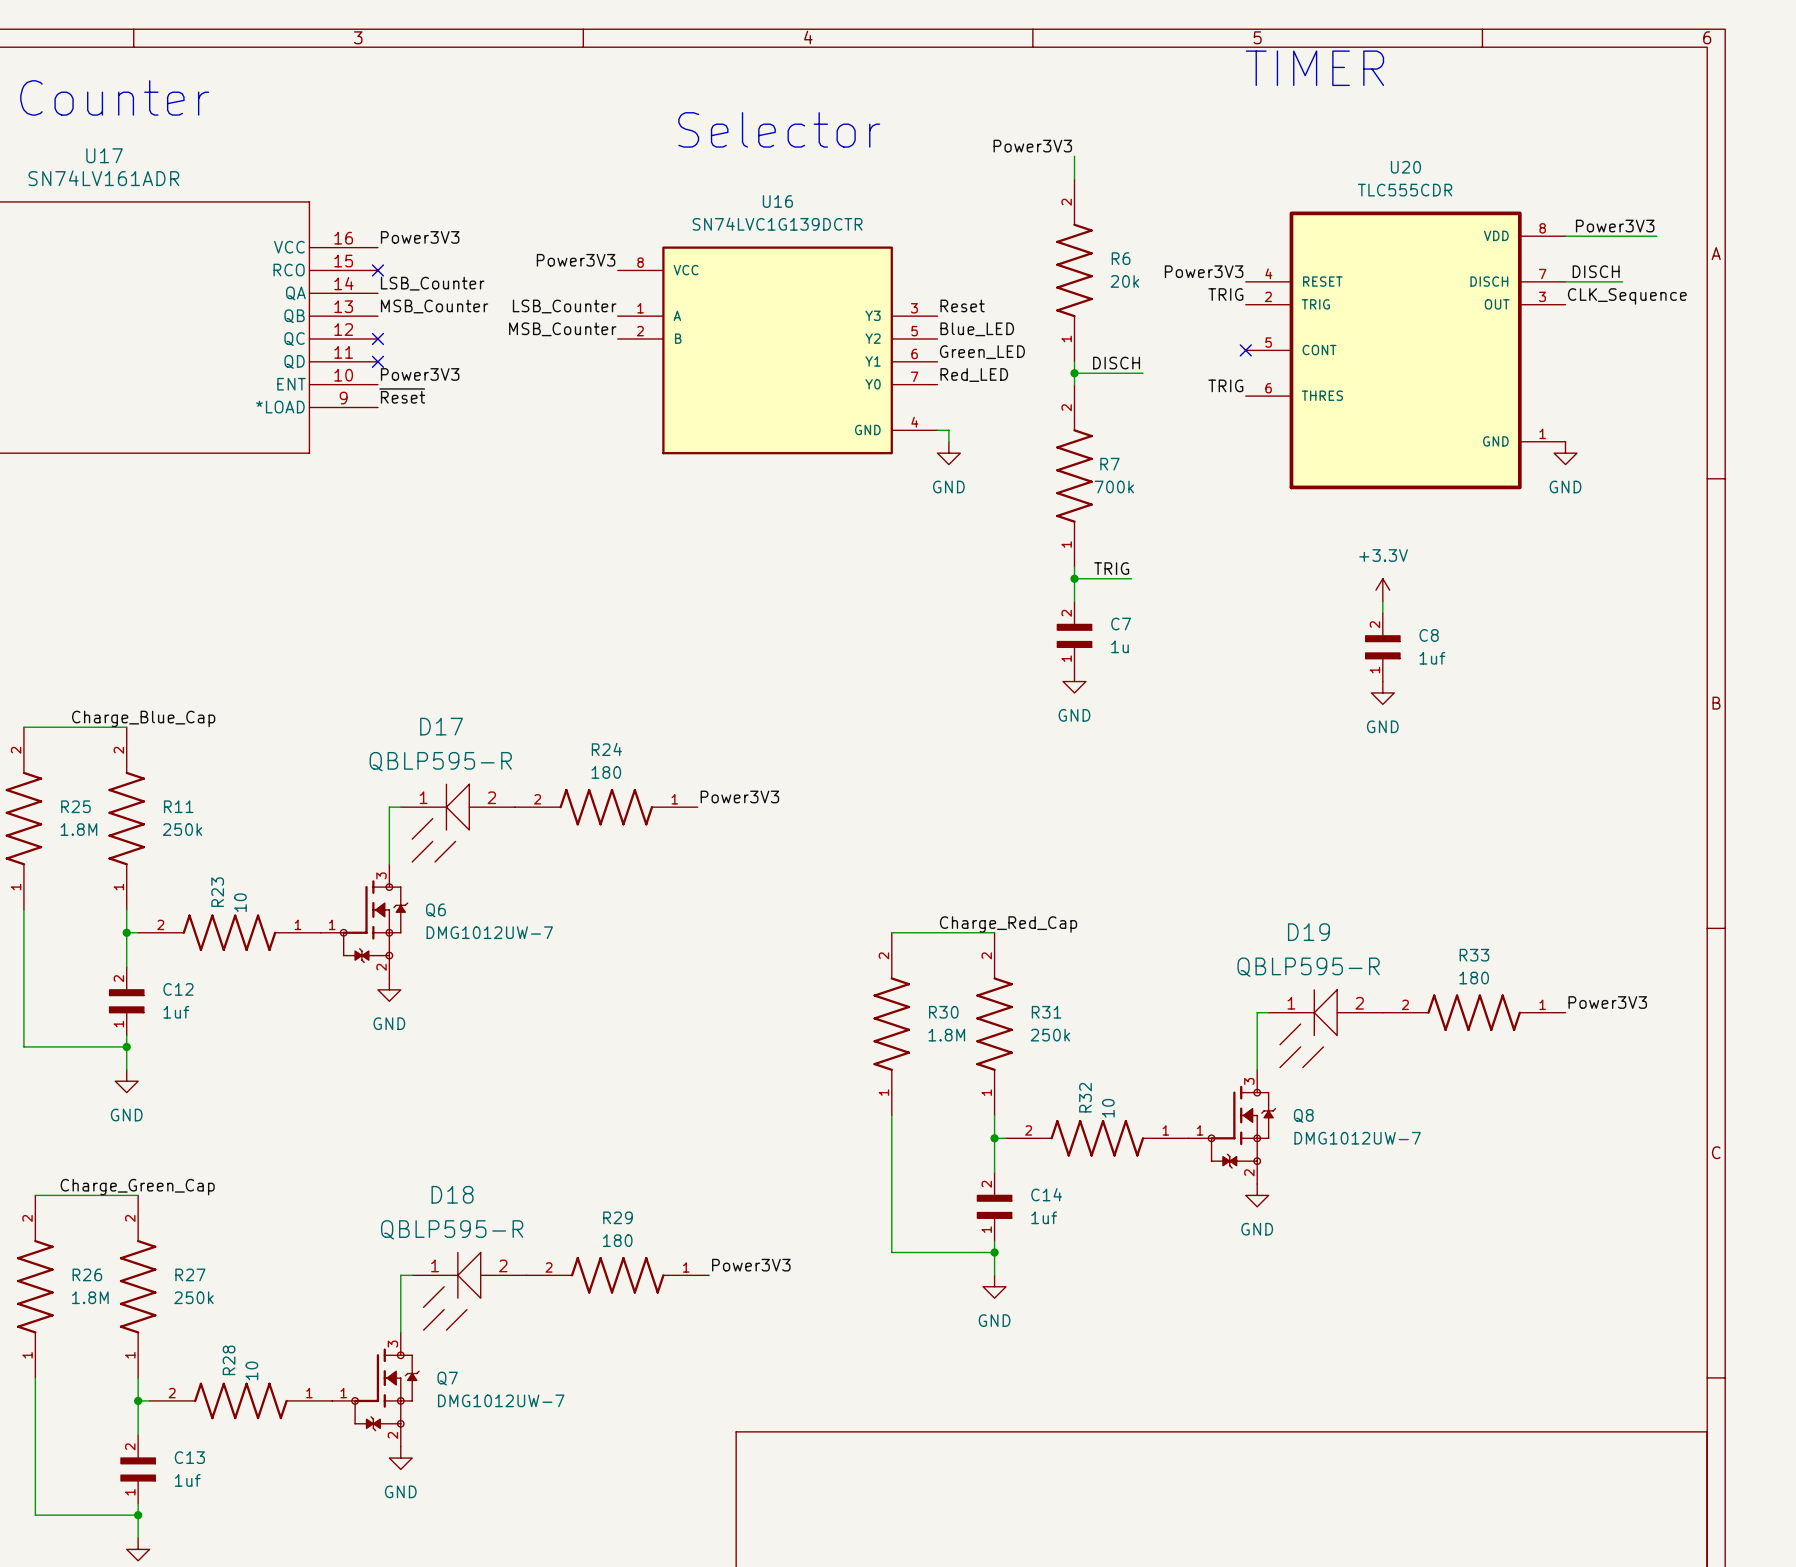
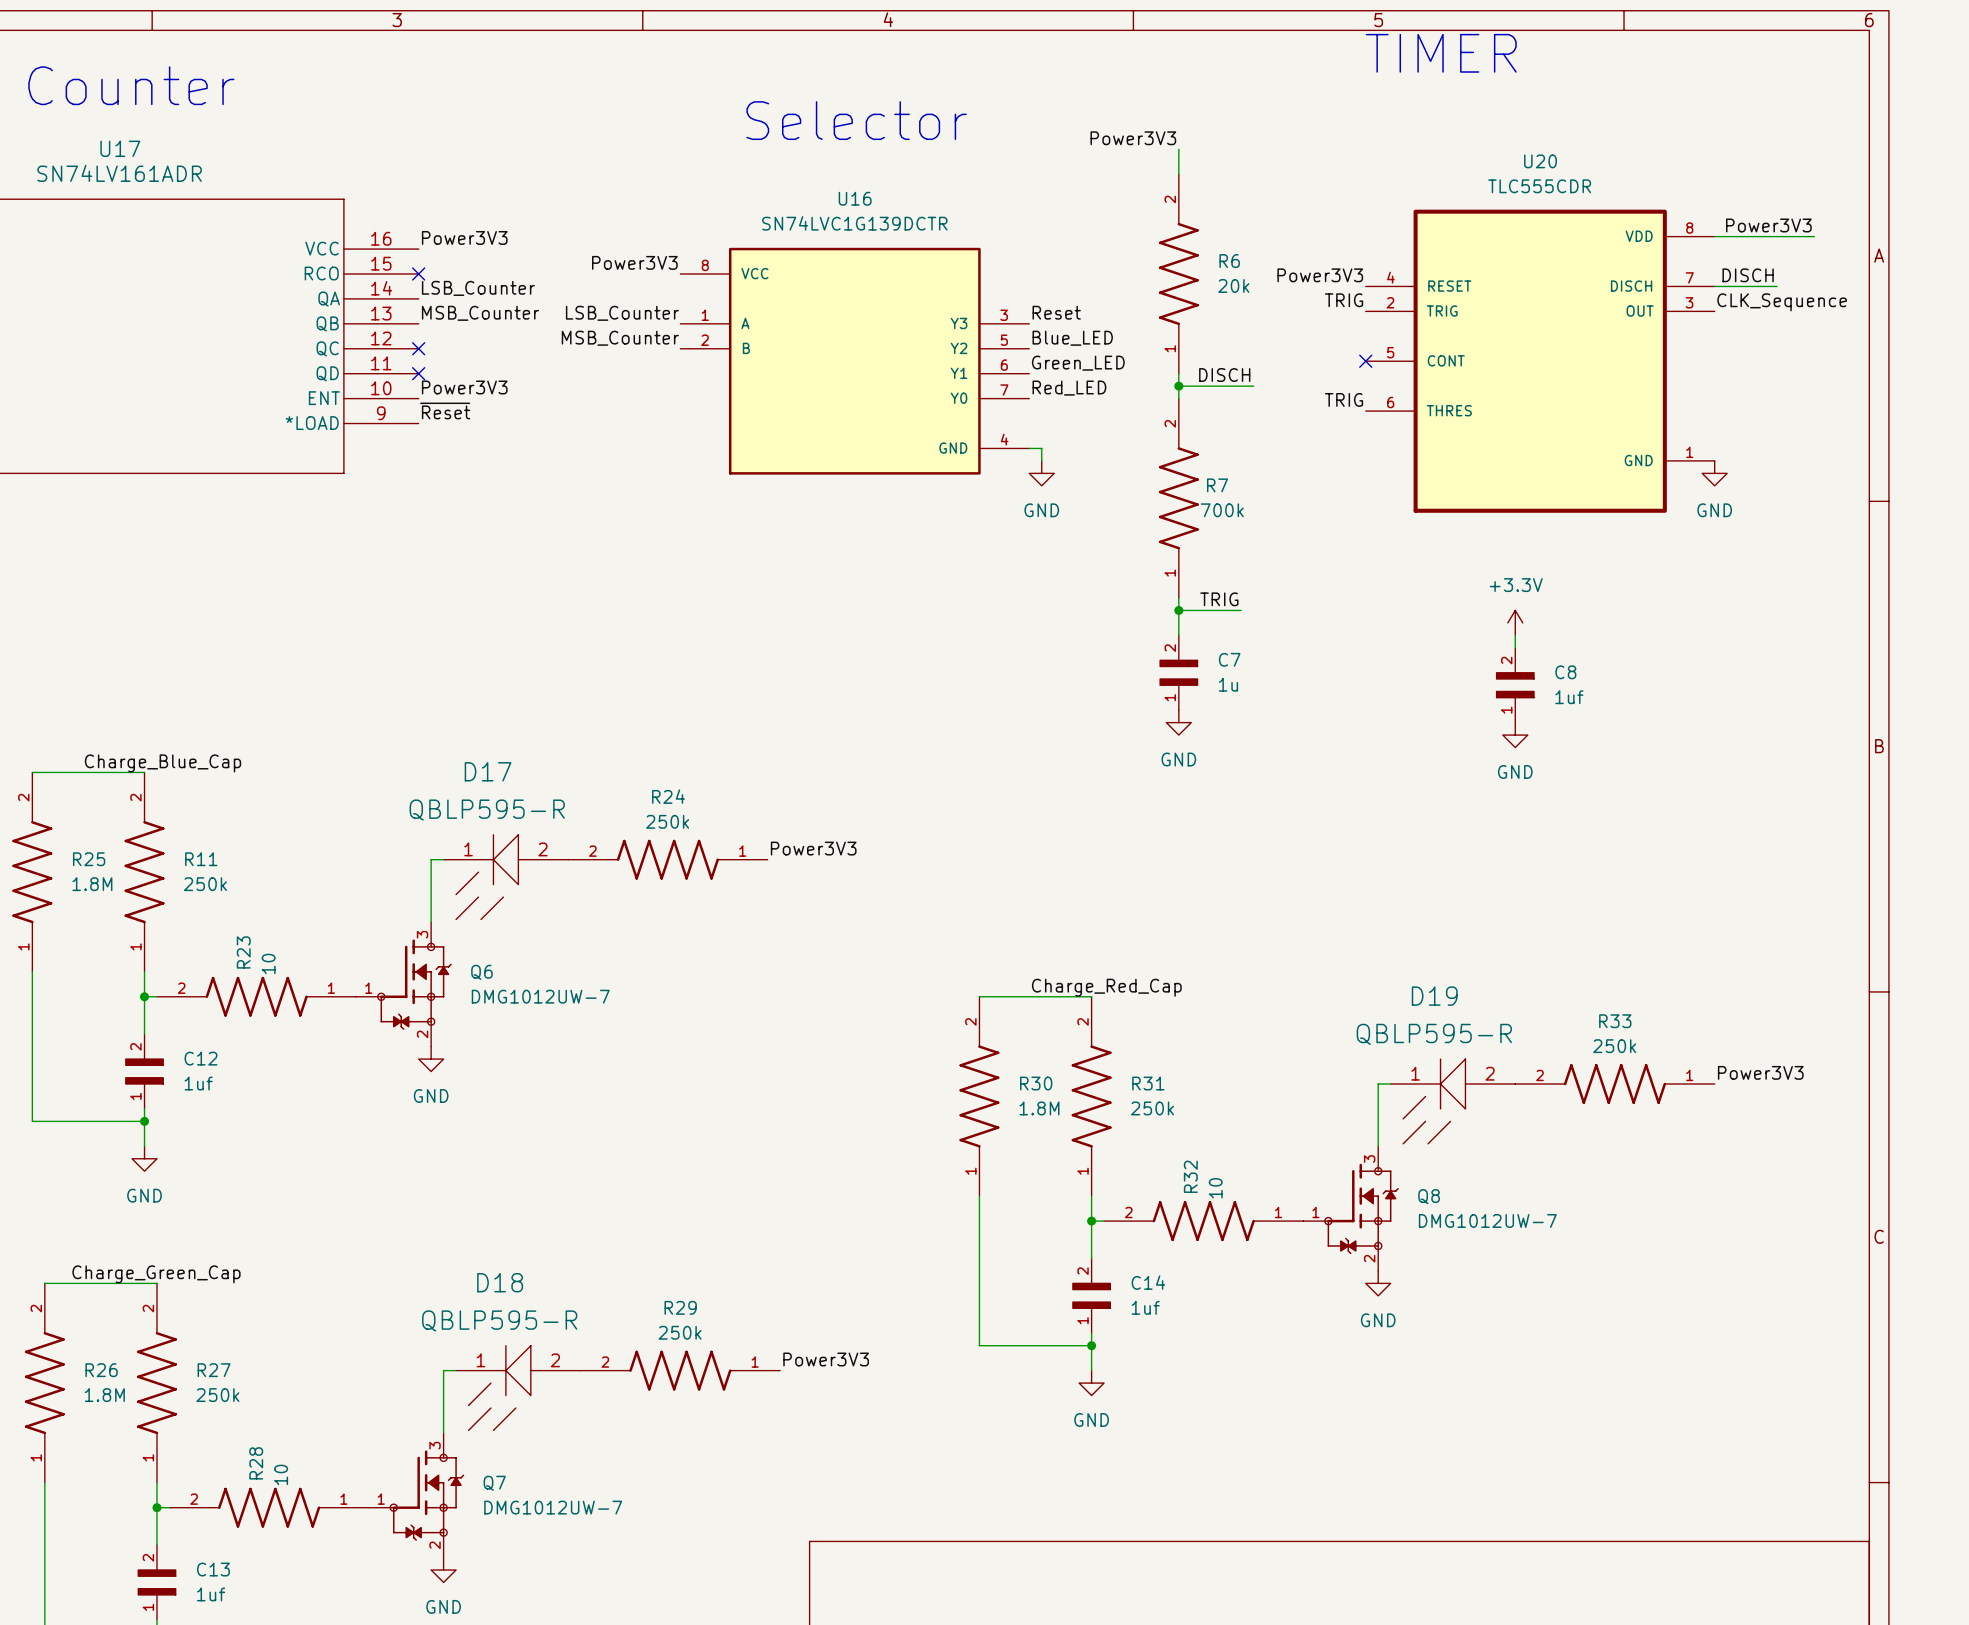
R24 value: 180 (606, 772) -> 250k (667, 821)
R33 value: 180 (1474, 978) -> 250k (1614, 1046)
R29 value: 180 (617, 1240) -> 250k (680, 1332)

